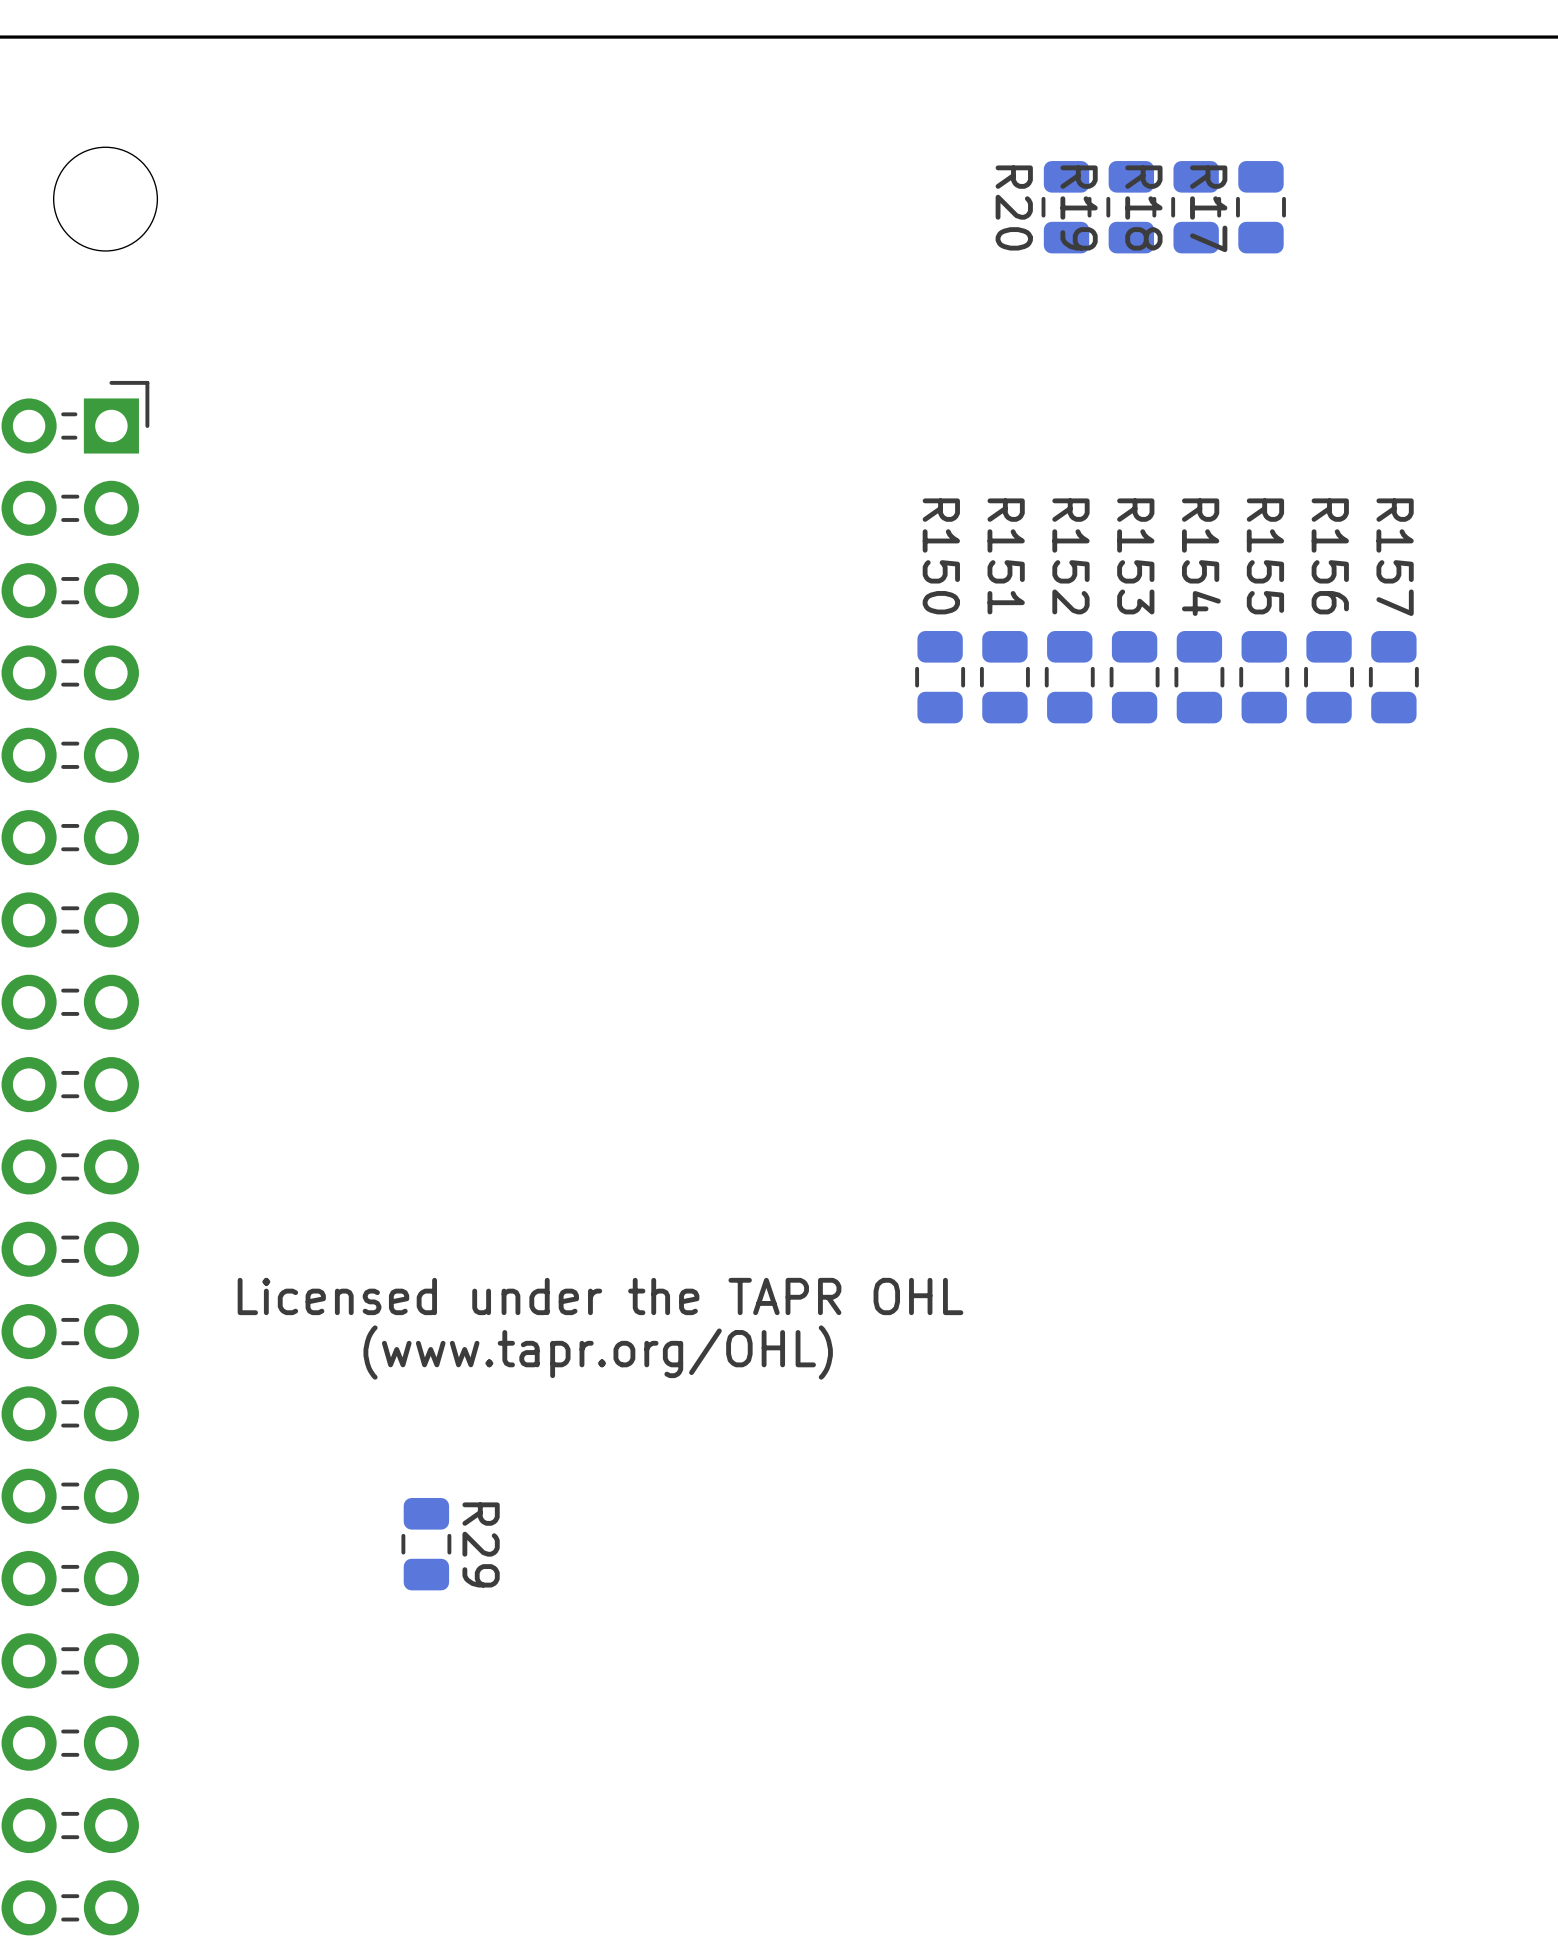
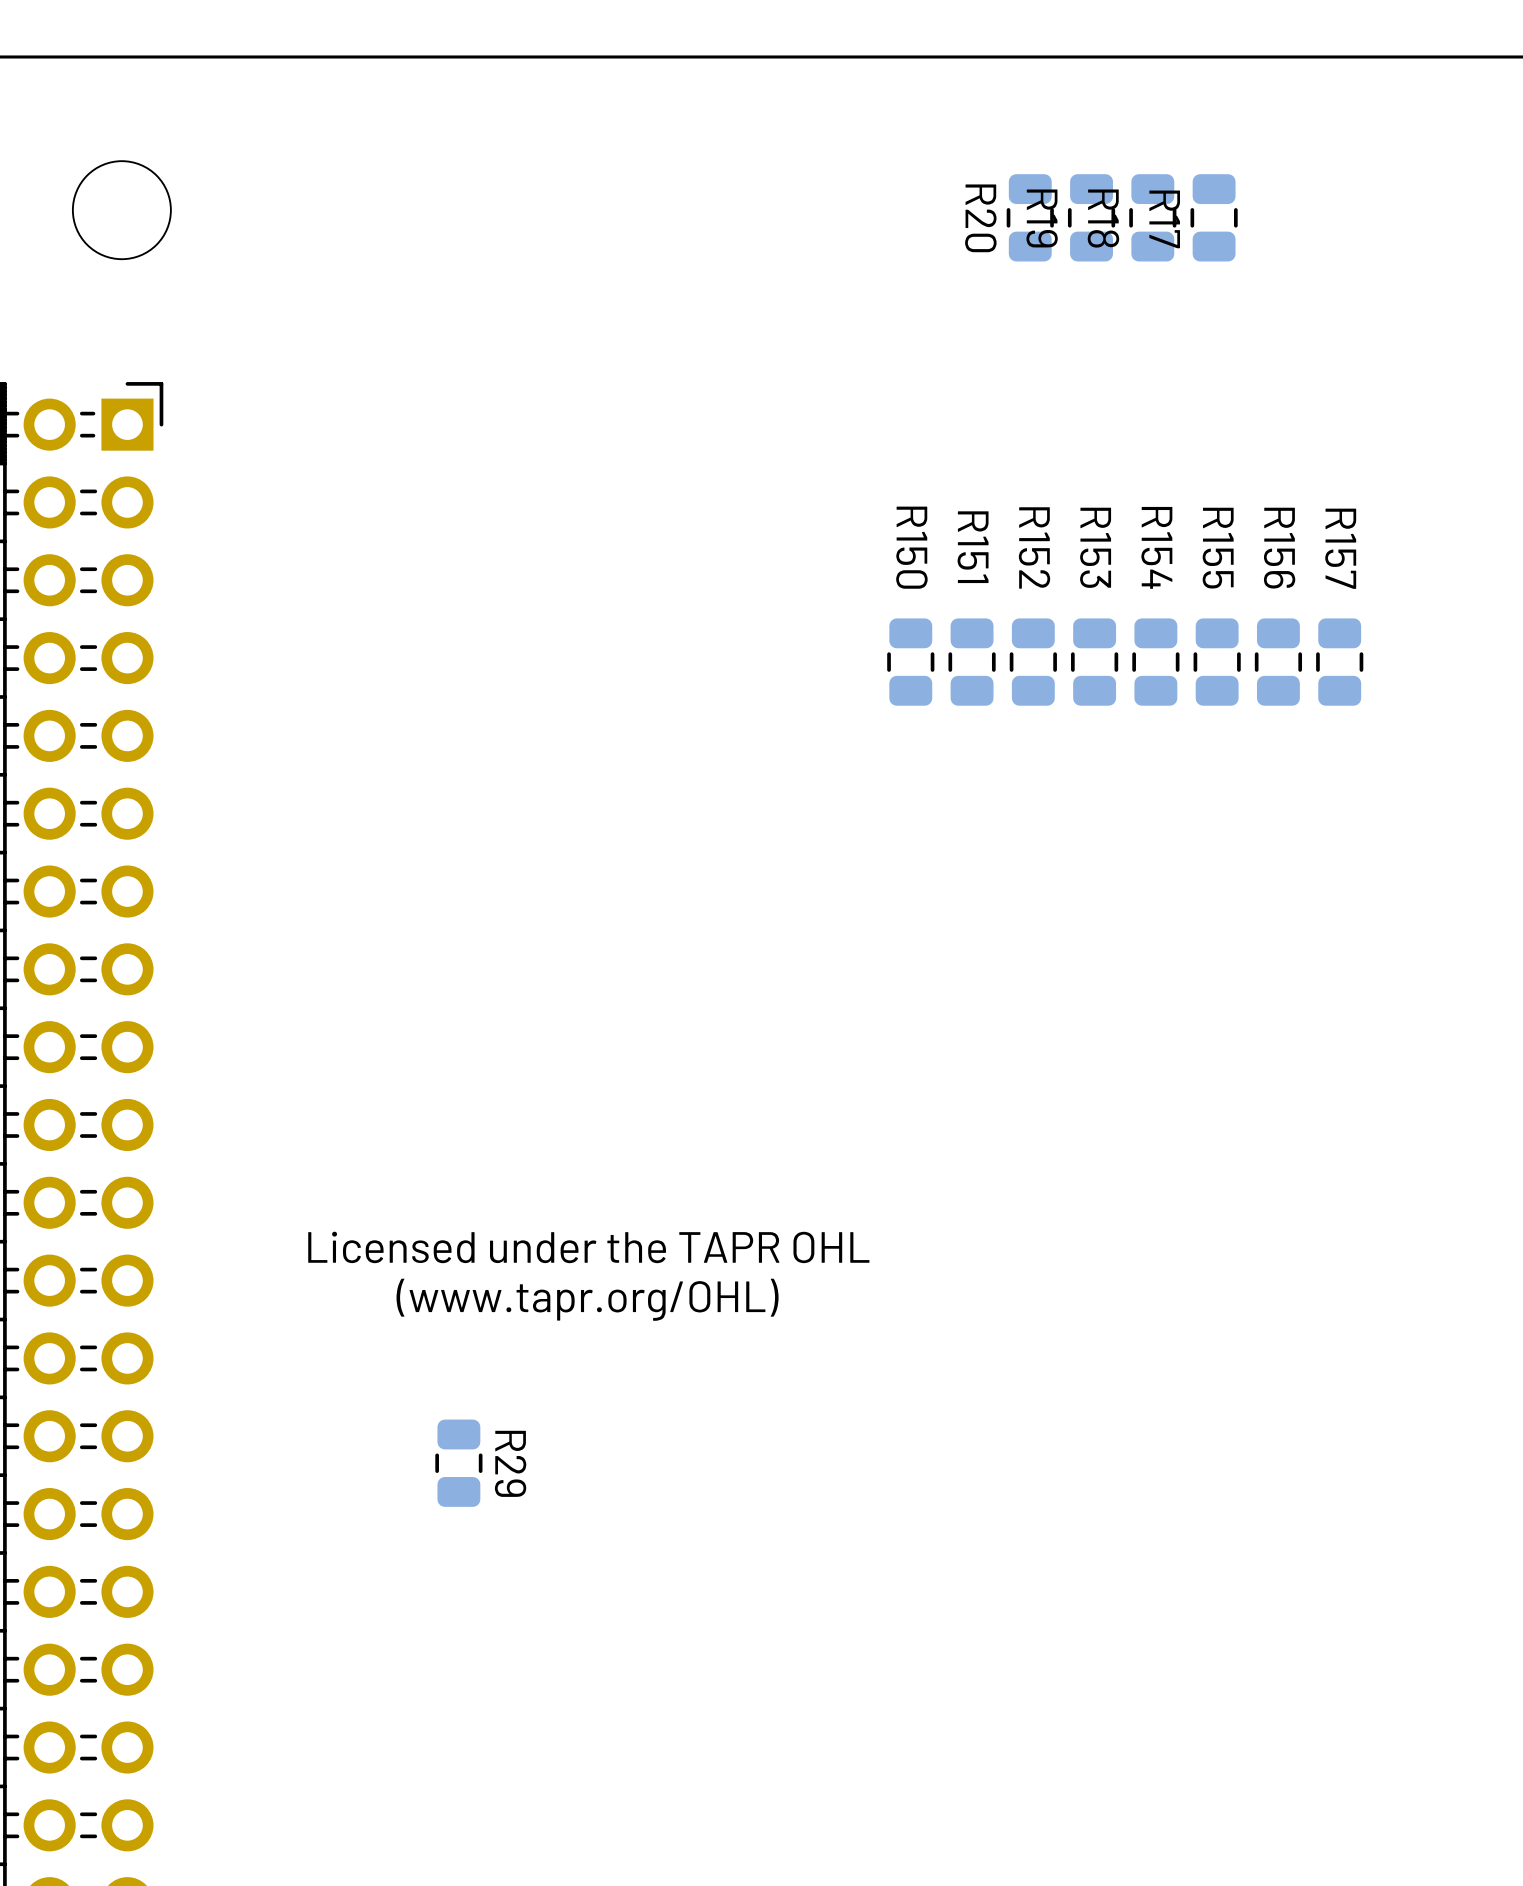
R29 position: (426, 1544) -> (458, 1463)

